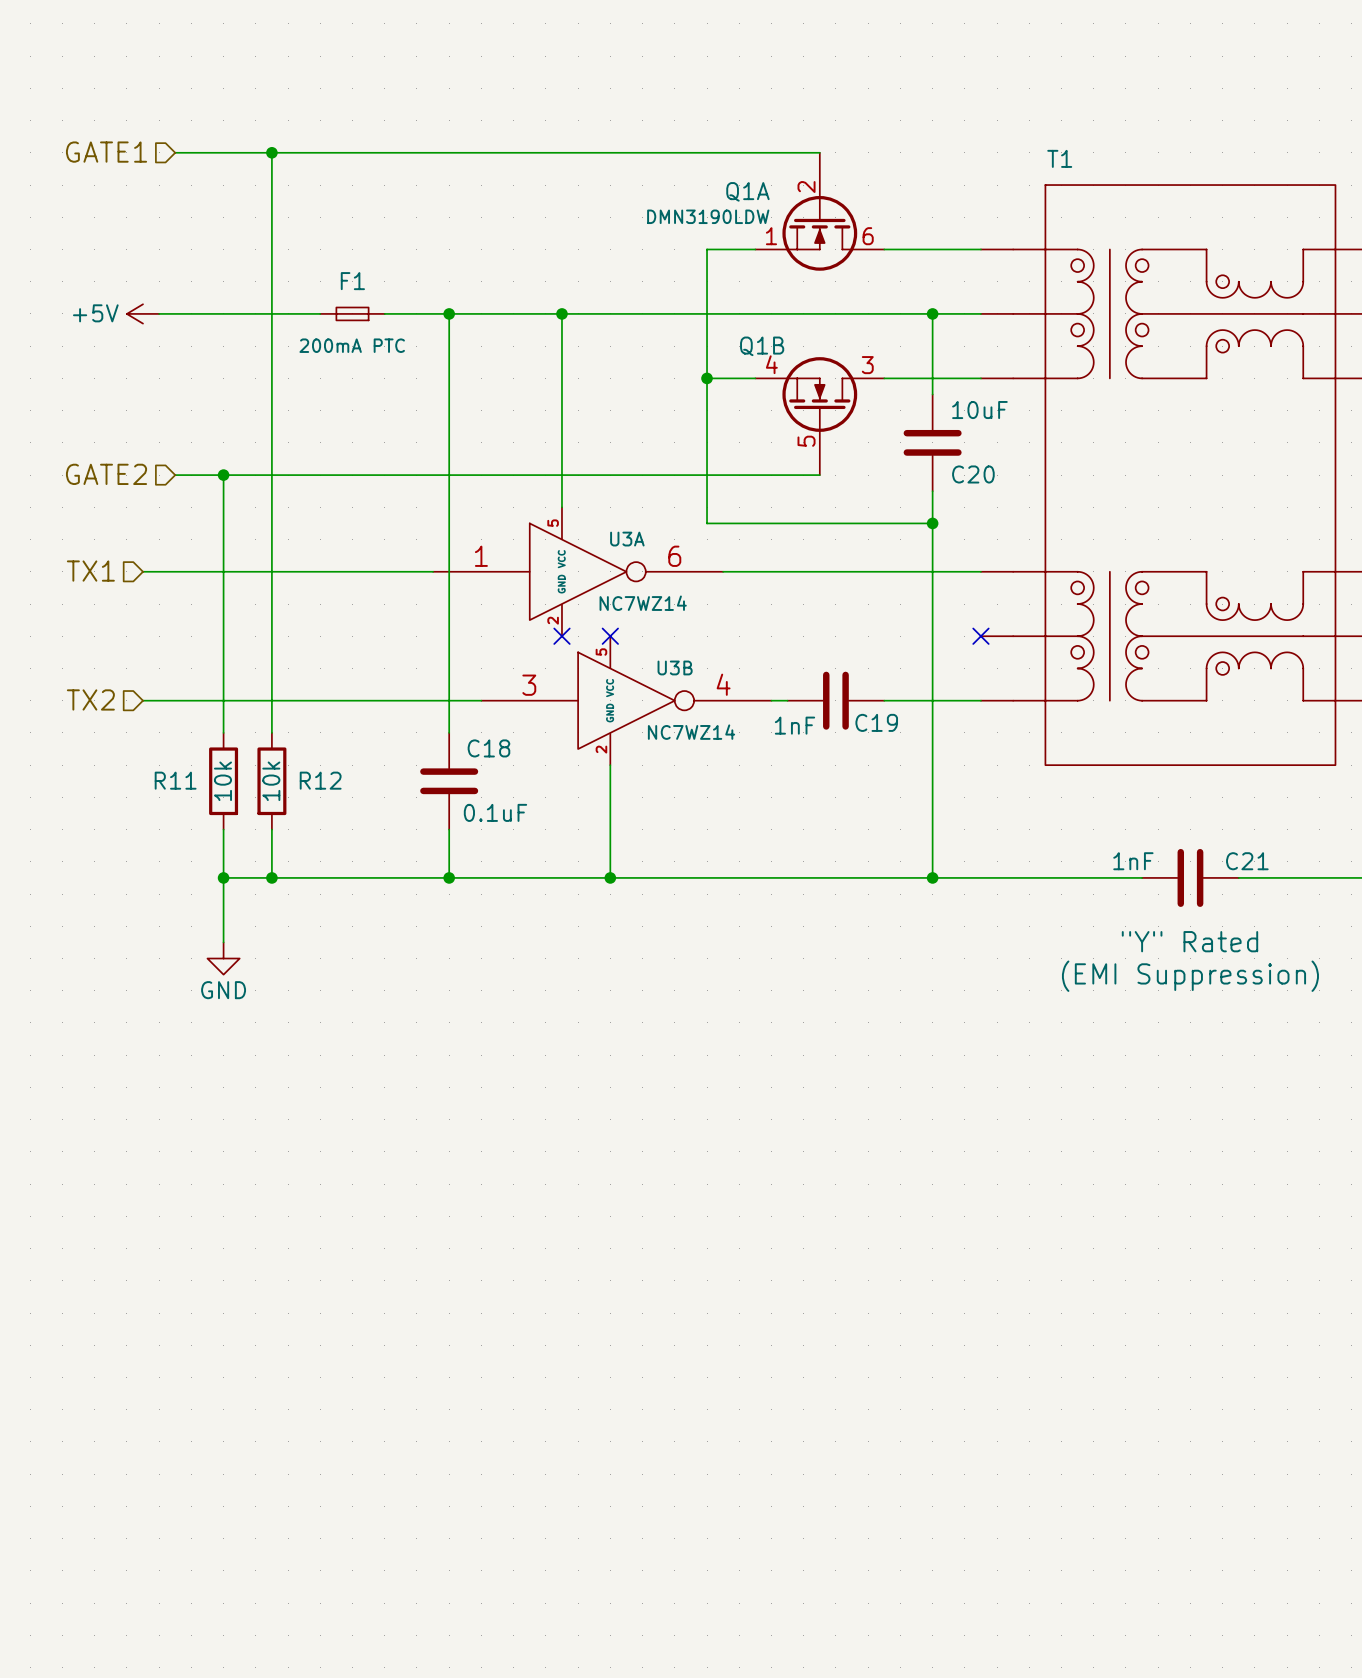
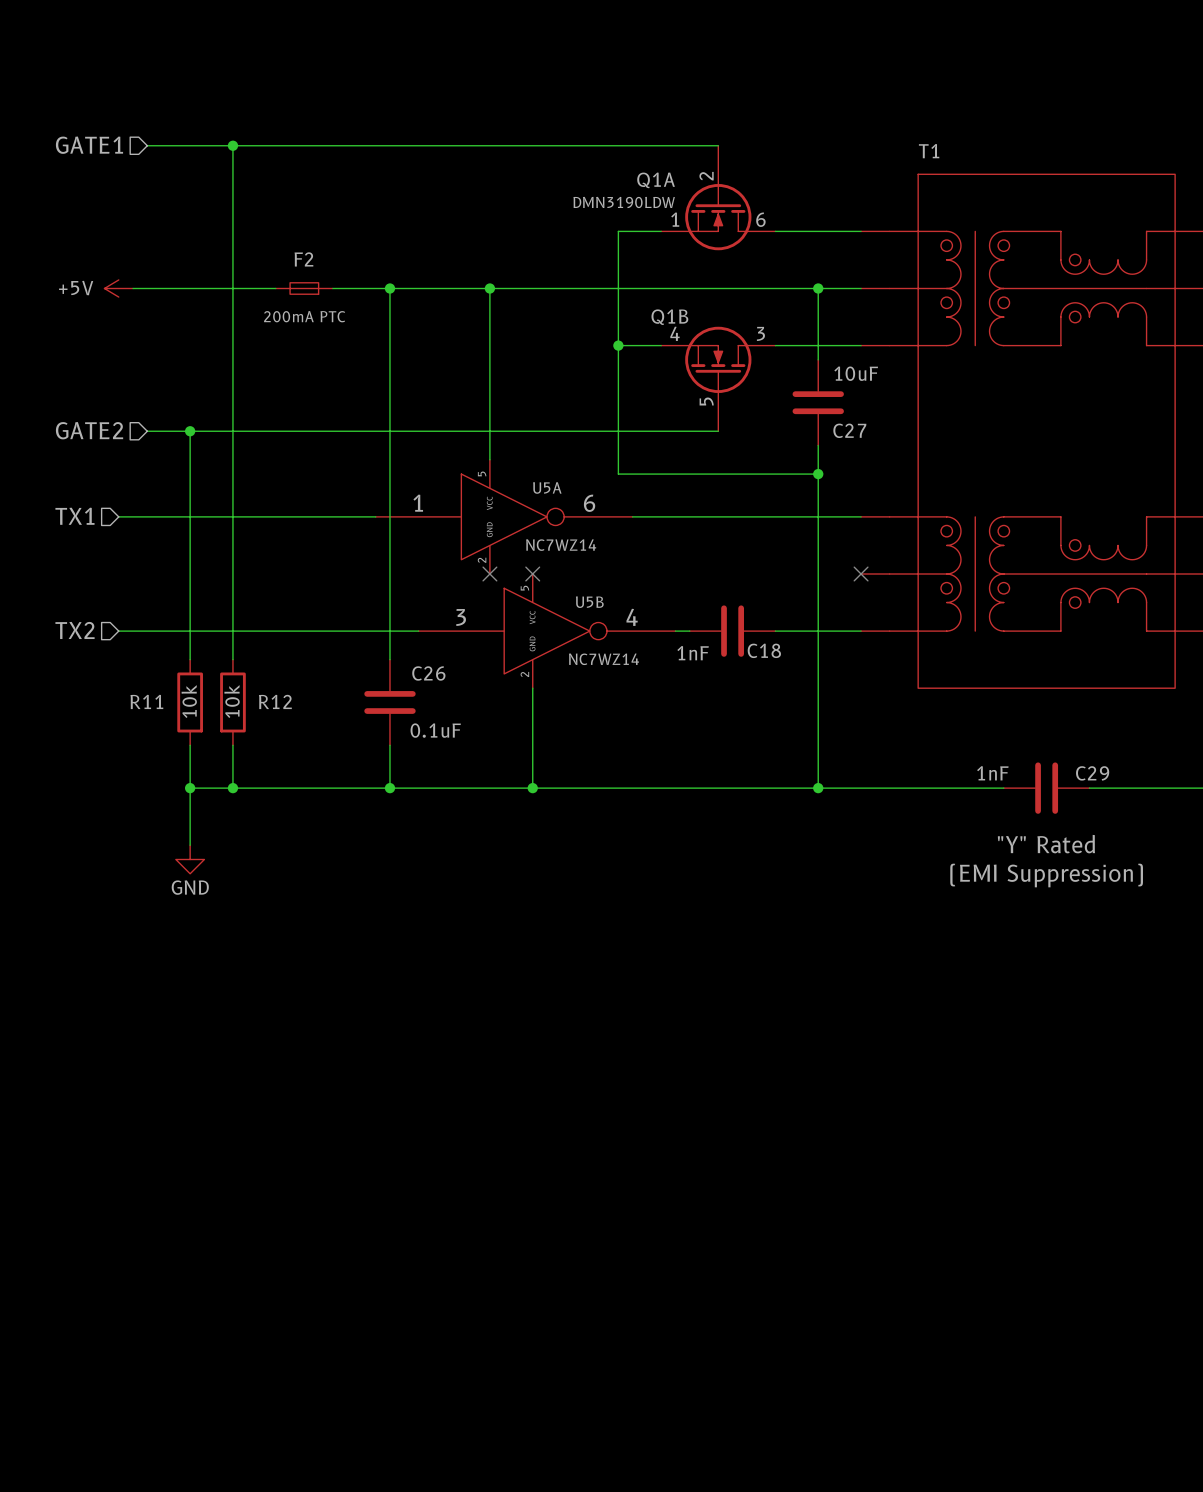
F1 name: F1 (352, 281) -> F2 (303, 259)
C20 name: C20 (973, 474) -> C27 (849, 430)
U3A name: U3A (627, 539) -> U5A (547, 487)
U3B name: U3B (675, 667) -> U5B (589, 602)
C19 name: C19 (876, 722) -> C18 (764, 650)
C18 name: C18 (488, 748) -> C26 (428, 673)
C21 name: C21 (1247, 861) -> C29 (1092, 773)

